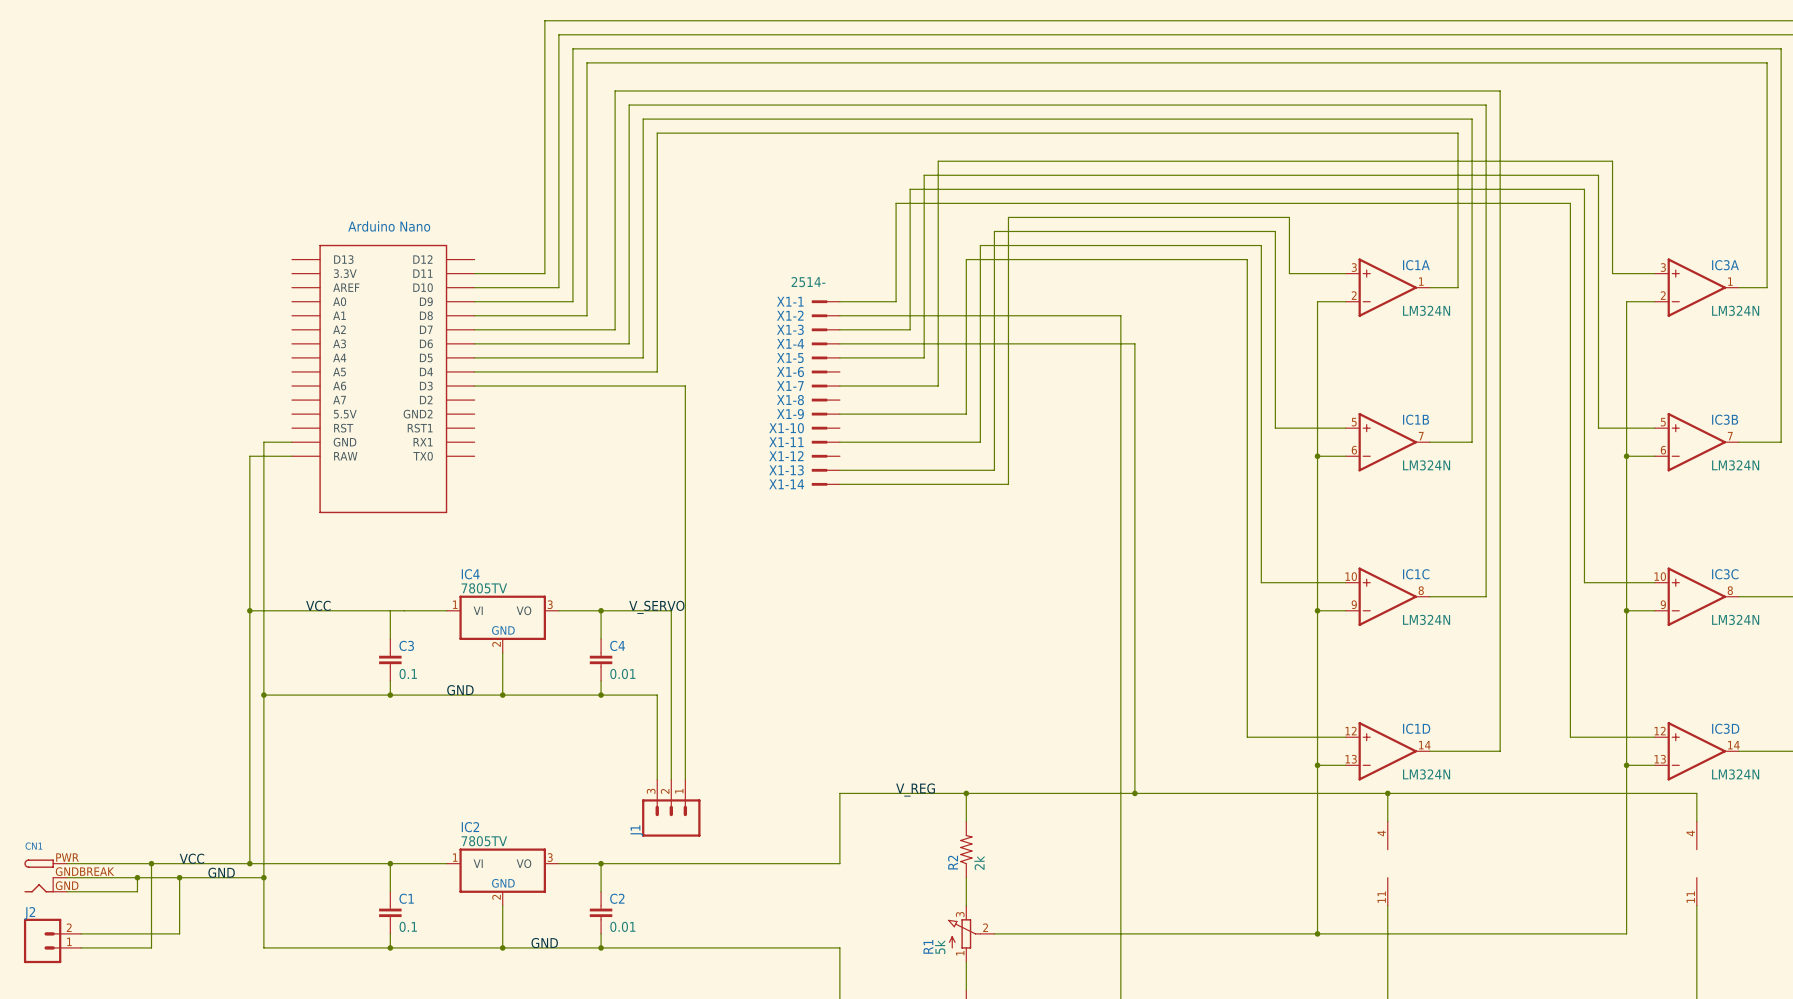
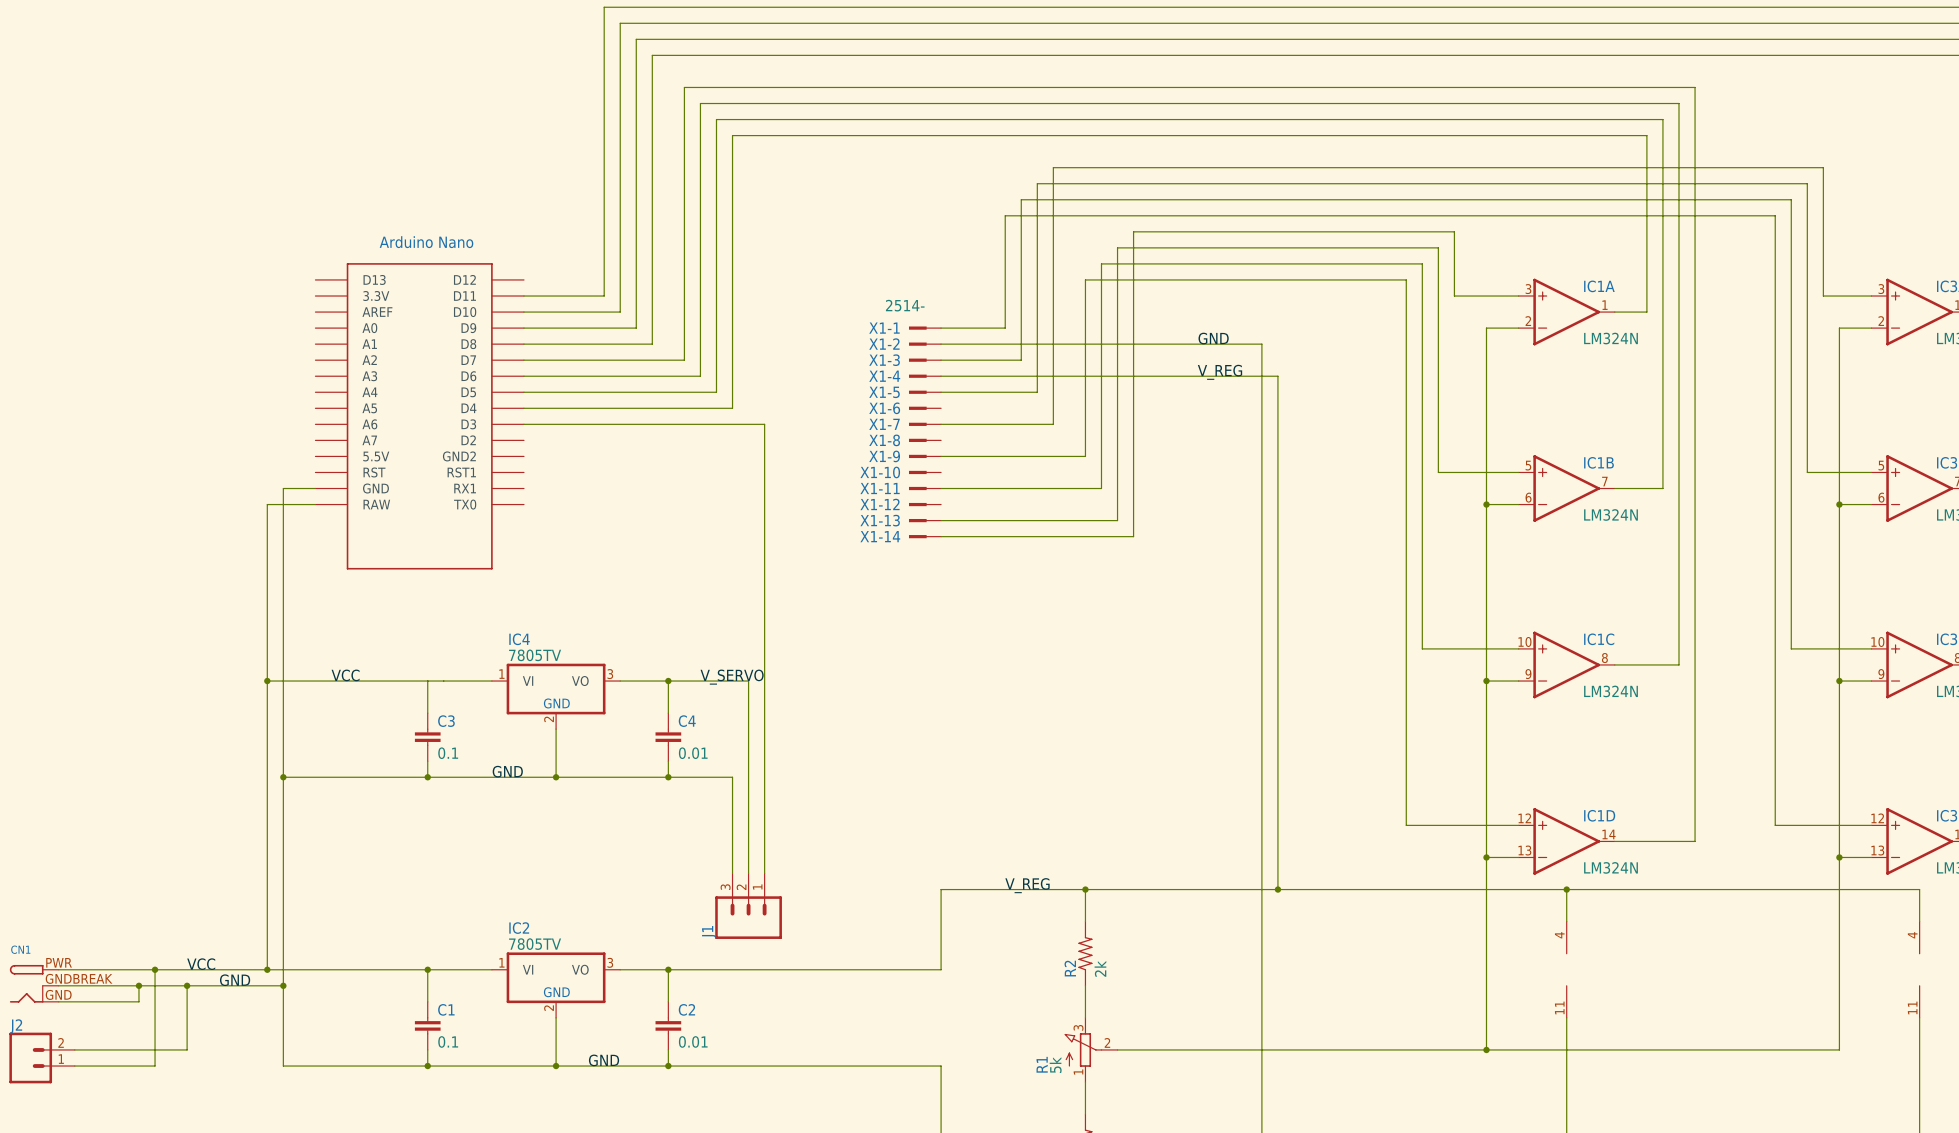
label: none -> GND (1213, 338)
label: none -> V_REG (1220, 372)

